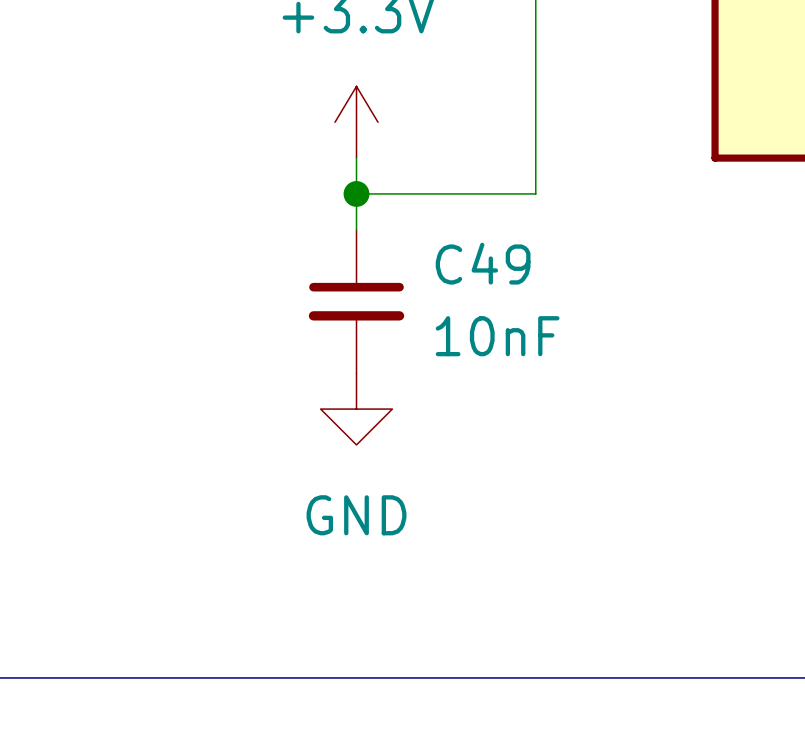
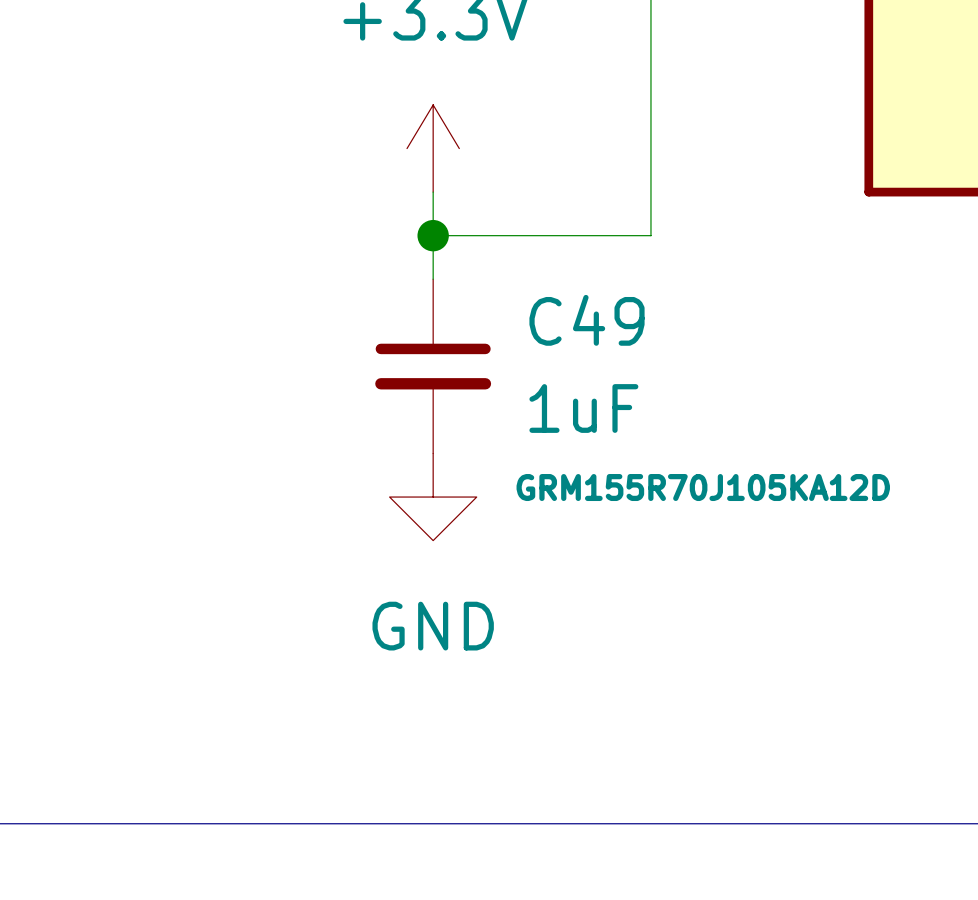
C49 value: 10nF (497, 336) -> 1uF (583, 408)
C49 text: none -> GRM155R70J105KA12D (703, 487)

